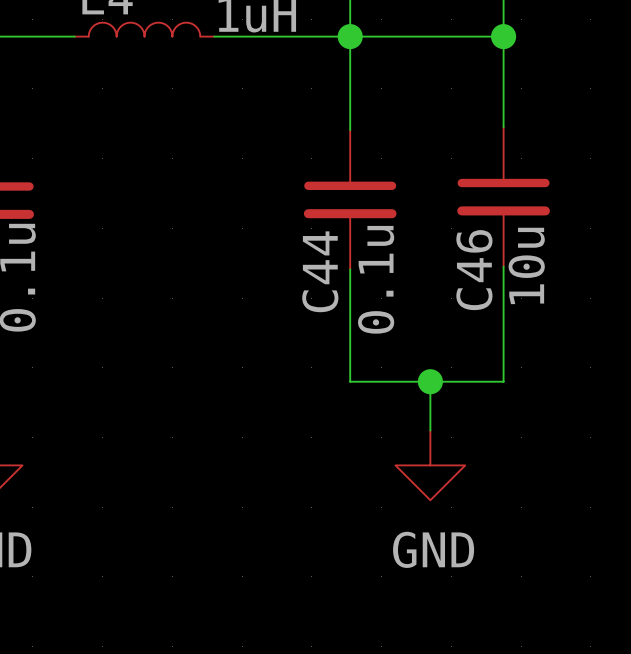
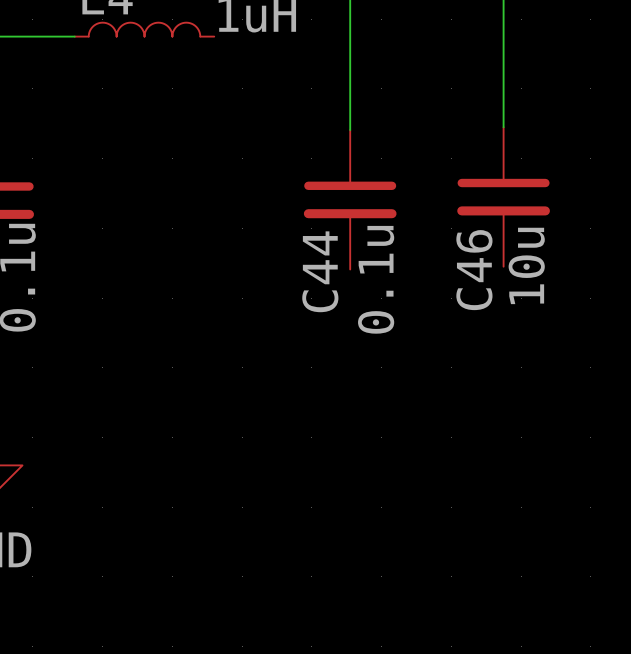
wire: (214, 36) (503, 36) -> none
junction: (350, 36) -> none
junction: (503, 36) -> none
wire: (503, 266) (503, 381) (350, 381) (350, 269) -> none
wire: (430, 381) (430, 430) -> none
junction: (430, 381) -> none
power symbol: GND (430, 465) -> none

